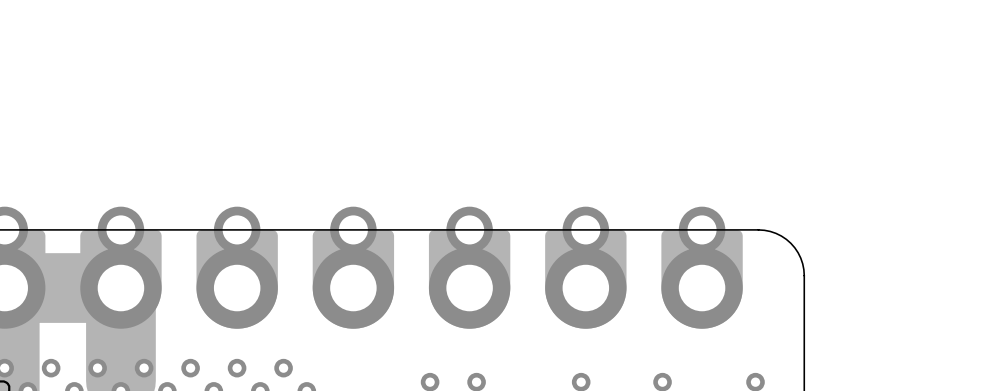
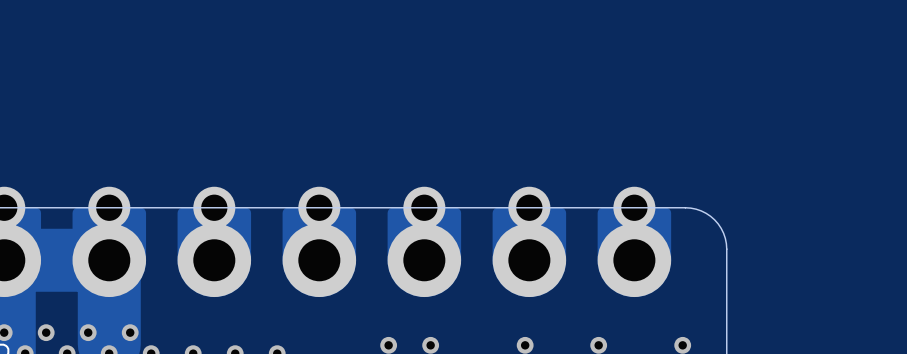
via: (190, 368) -> none
via: (237, 368) -> none
via: (283, 368) -> none

